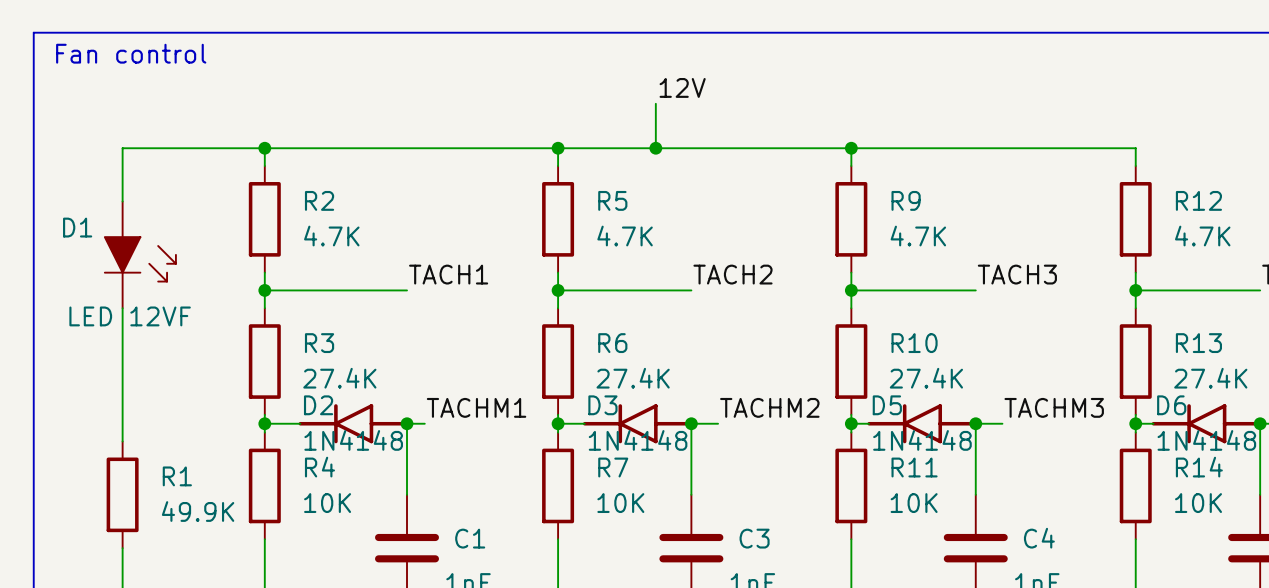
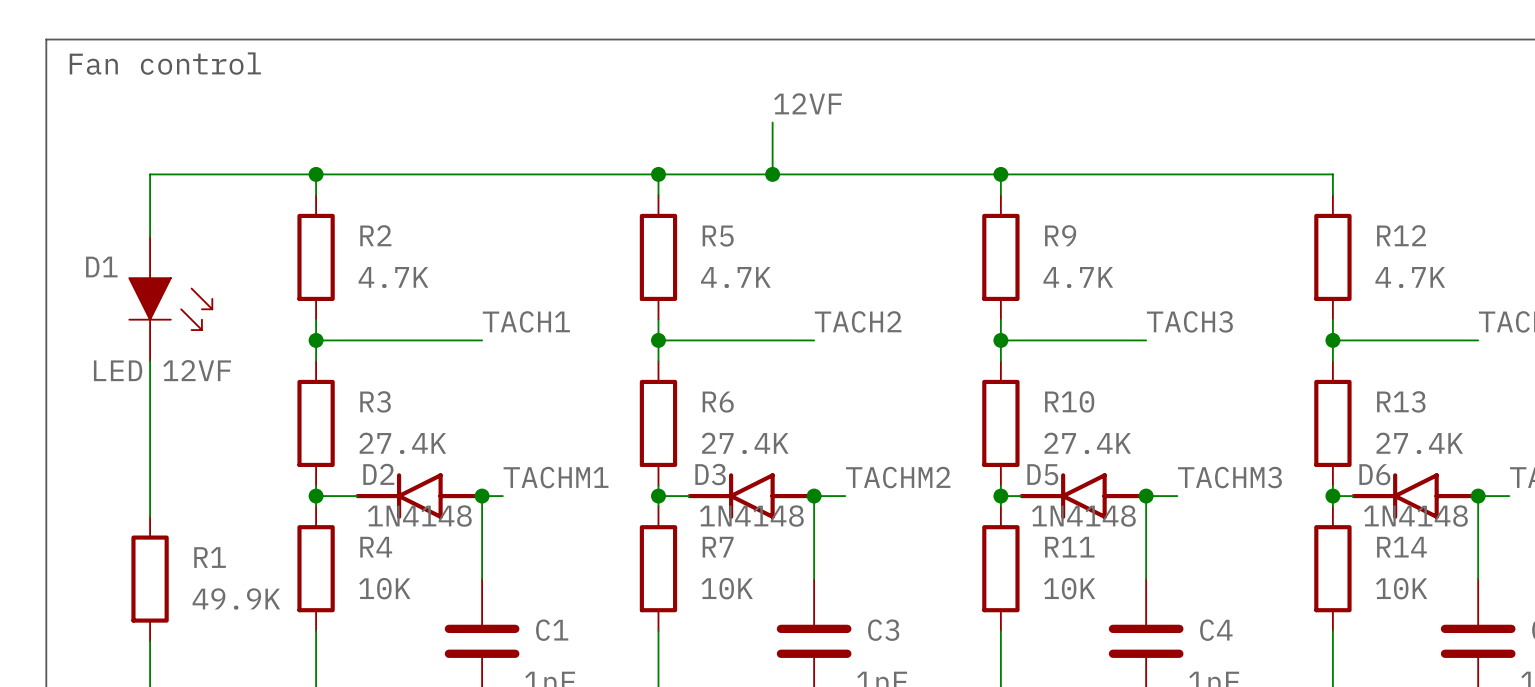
label: 12V (682, 87) -> 12VF (808, 103)

